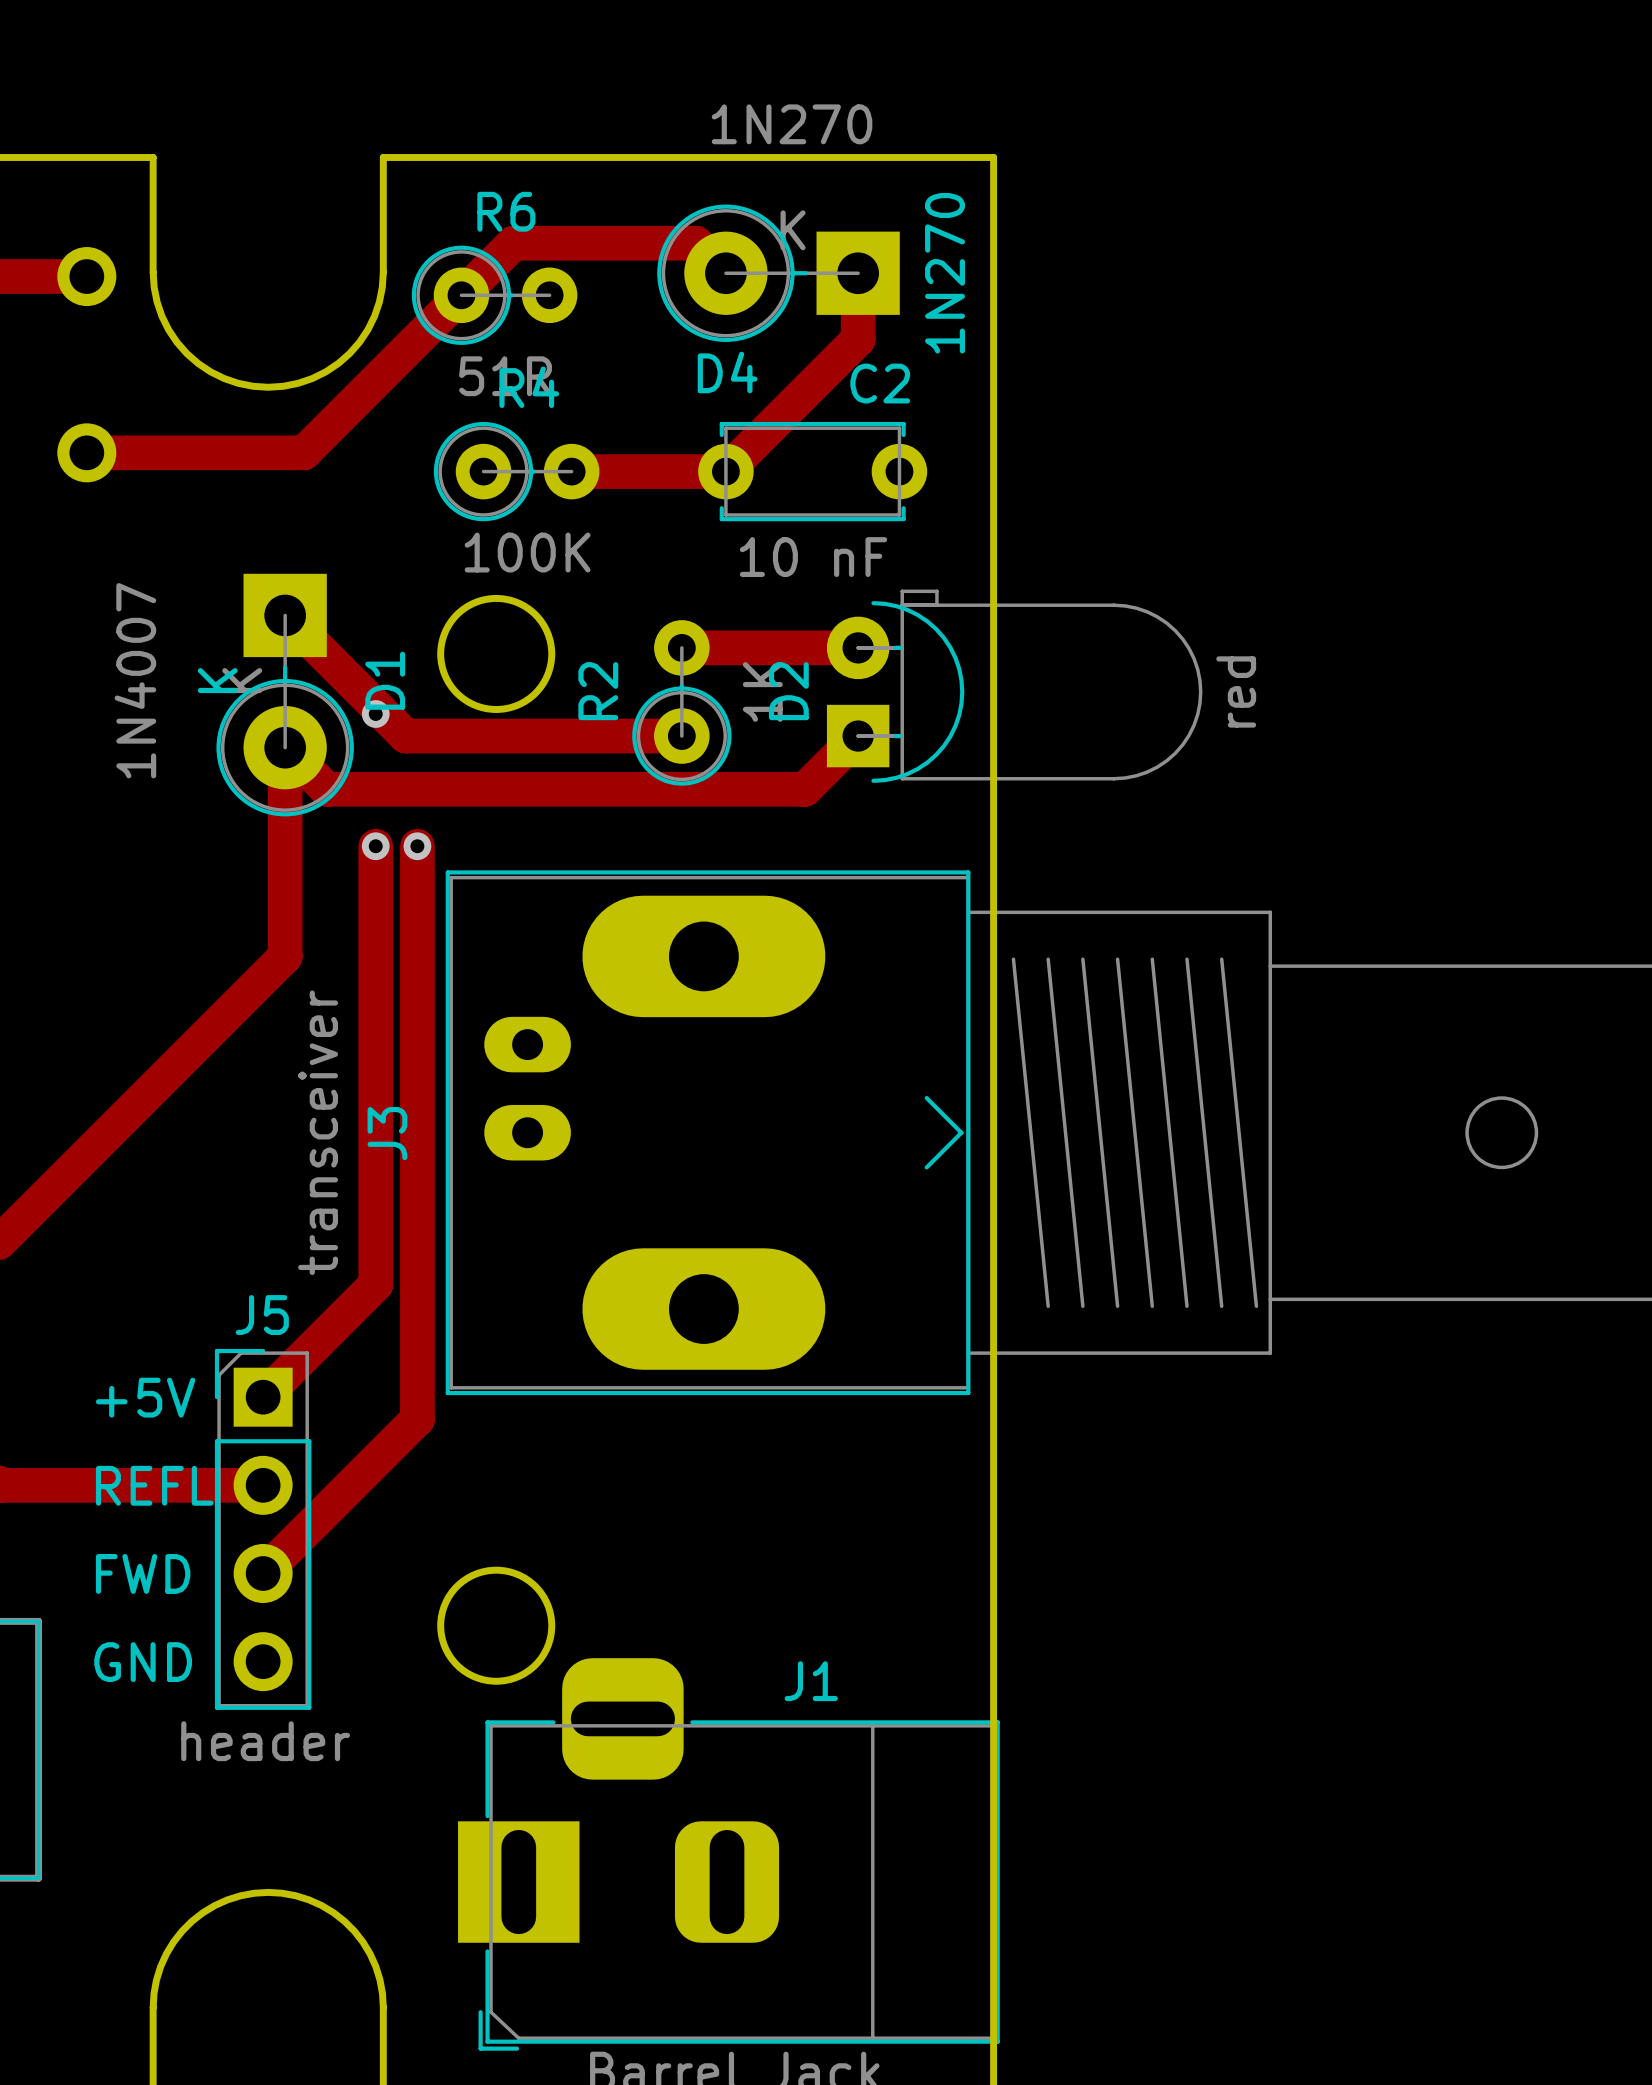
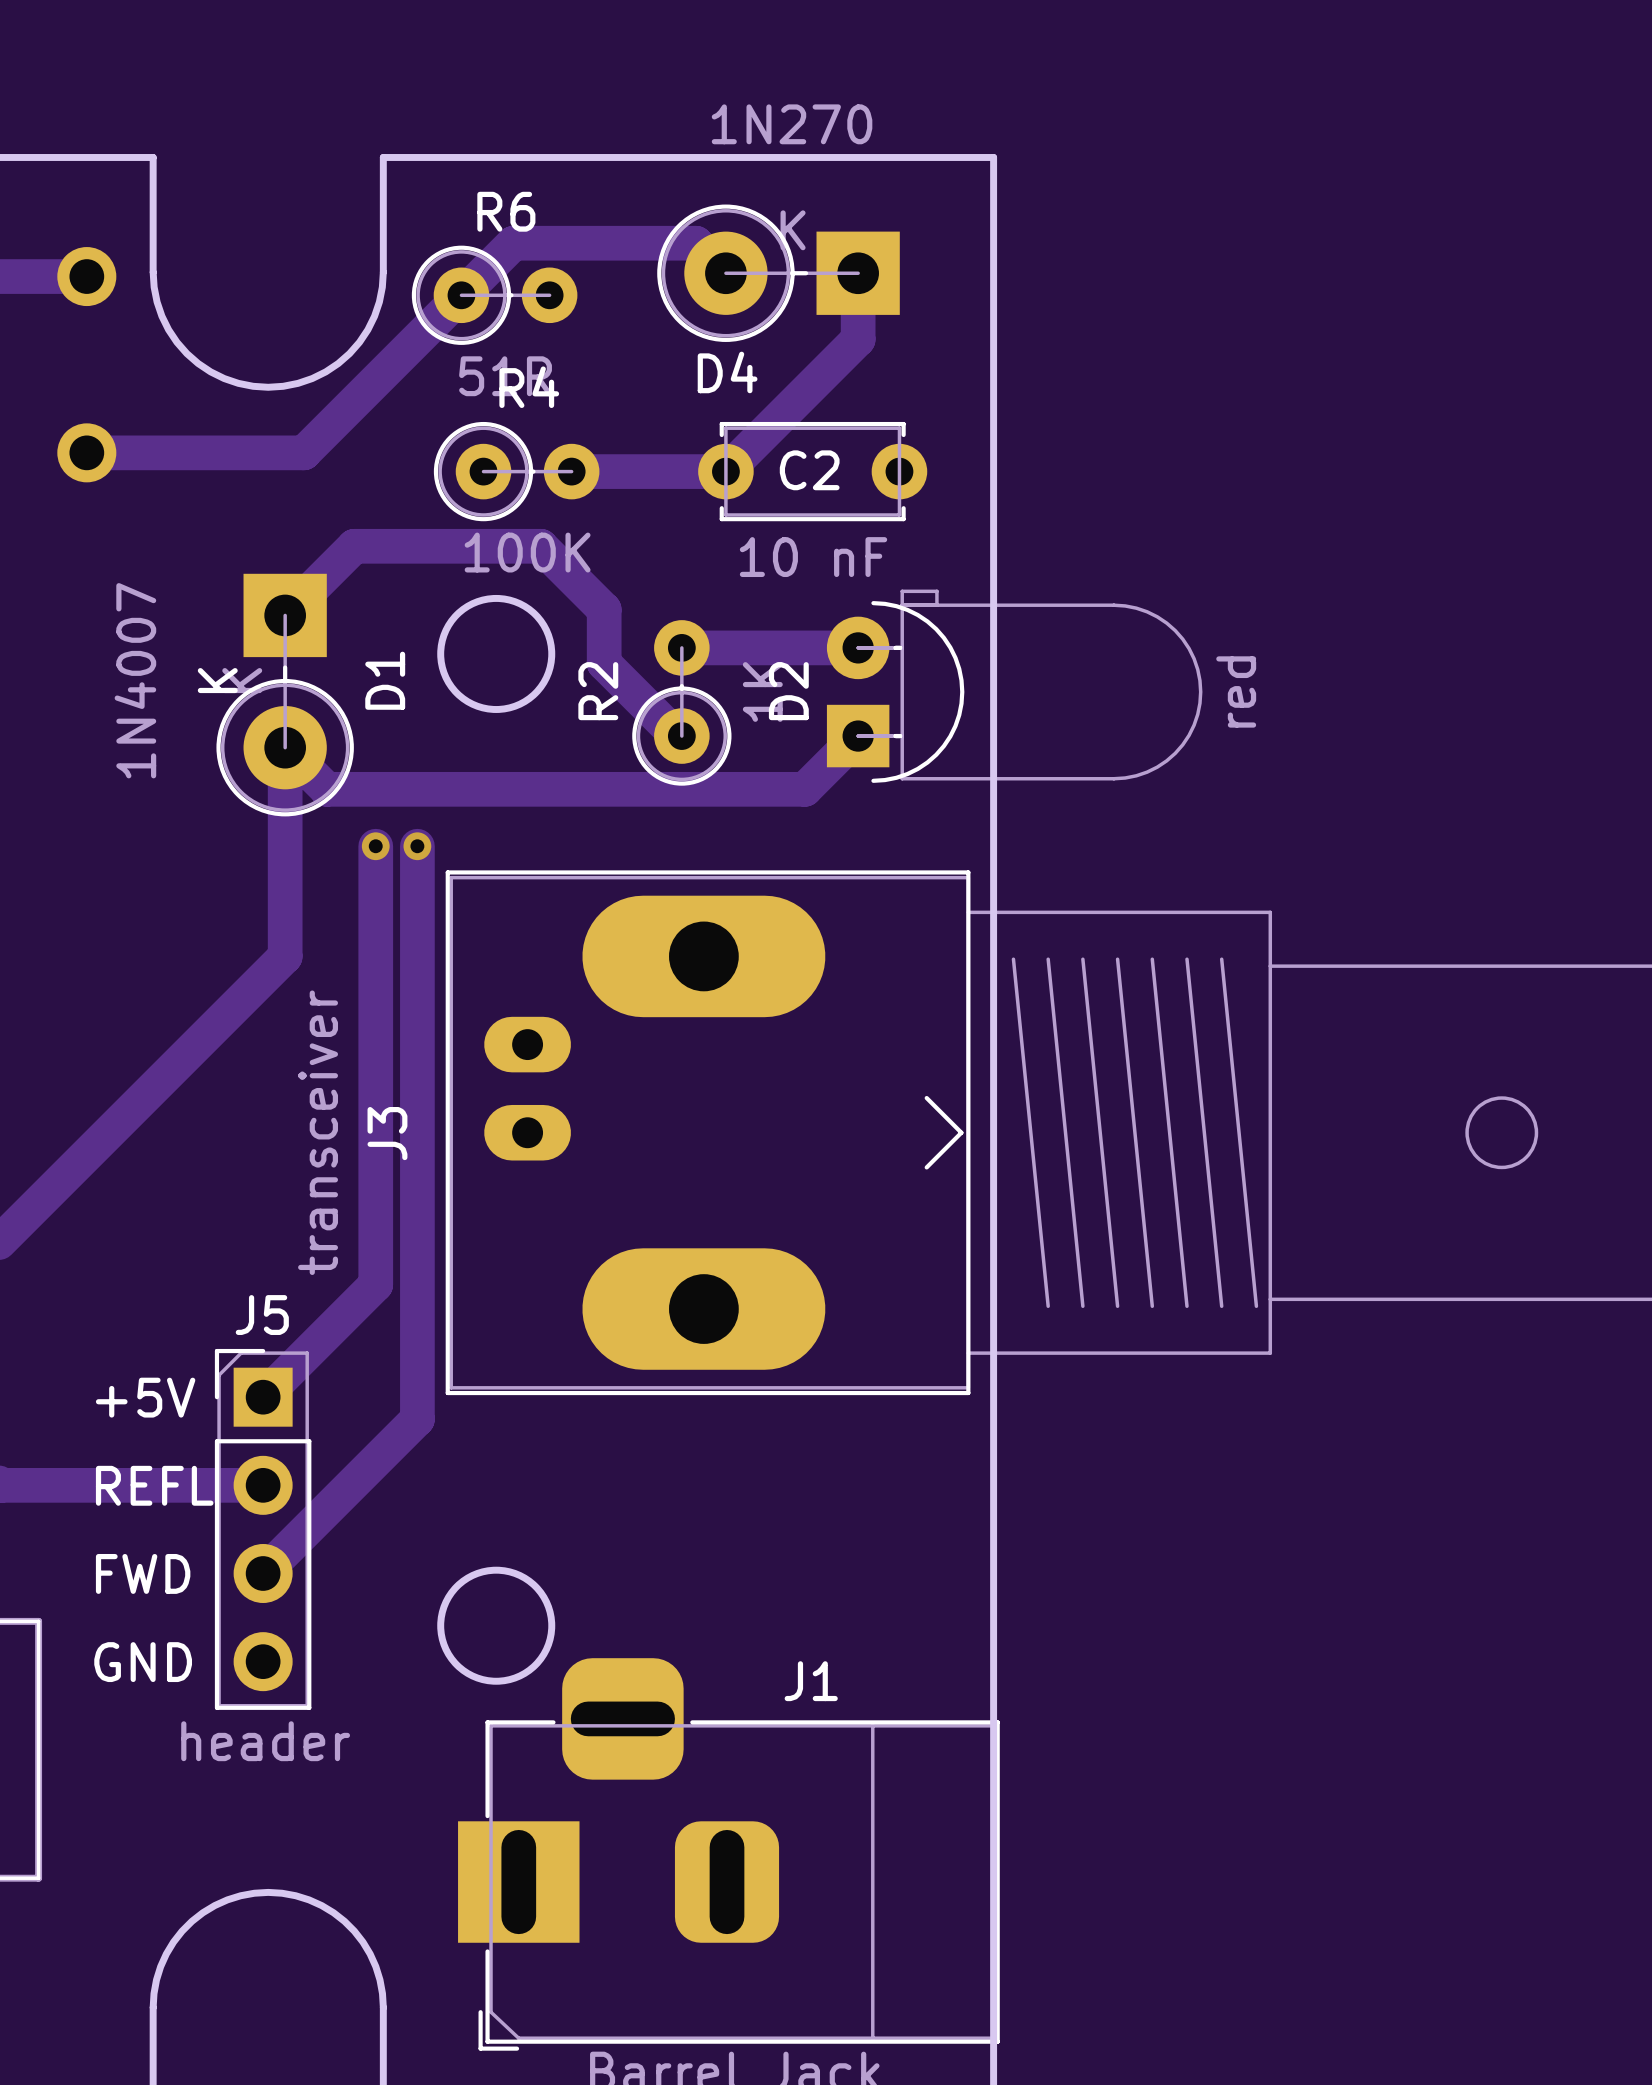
D4 text: 1N270 (945, 273) -> none
C2 name position: C2 (880, 383) -> C2 (809, 470)
track: (285, 615) (405, 736) (676, 736) -> (285, 615) (354, 546) (540, 546) (604, 609) (604, 663) (676, 736)
via: (375, 714) -> none

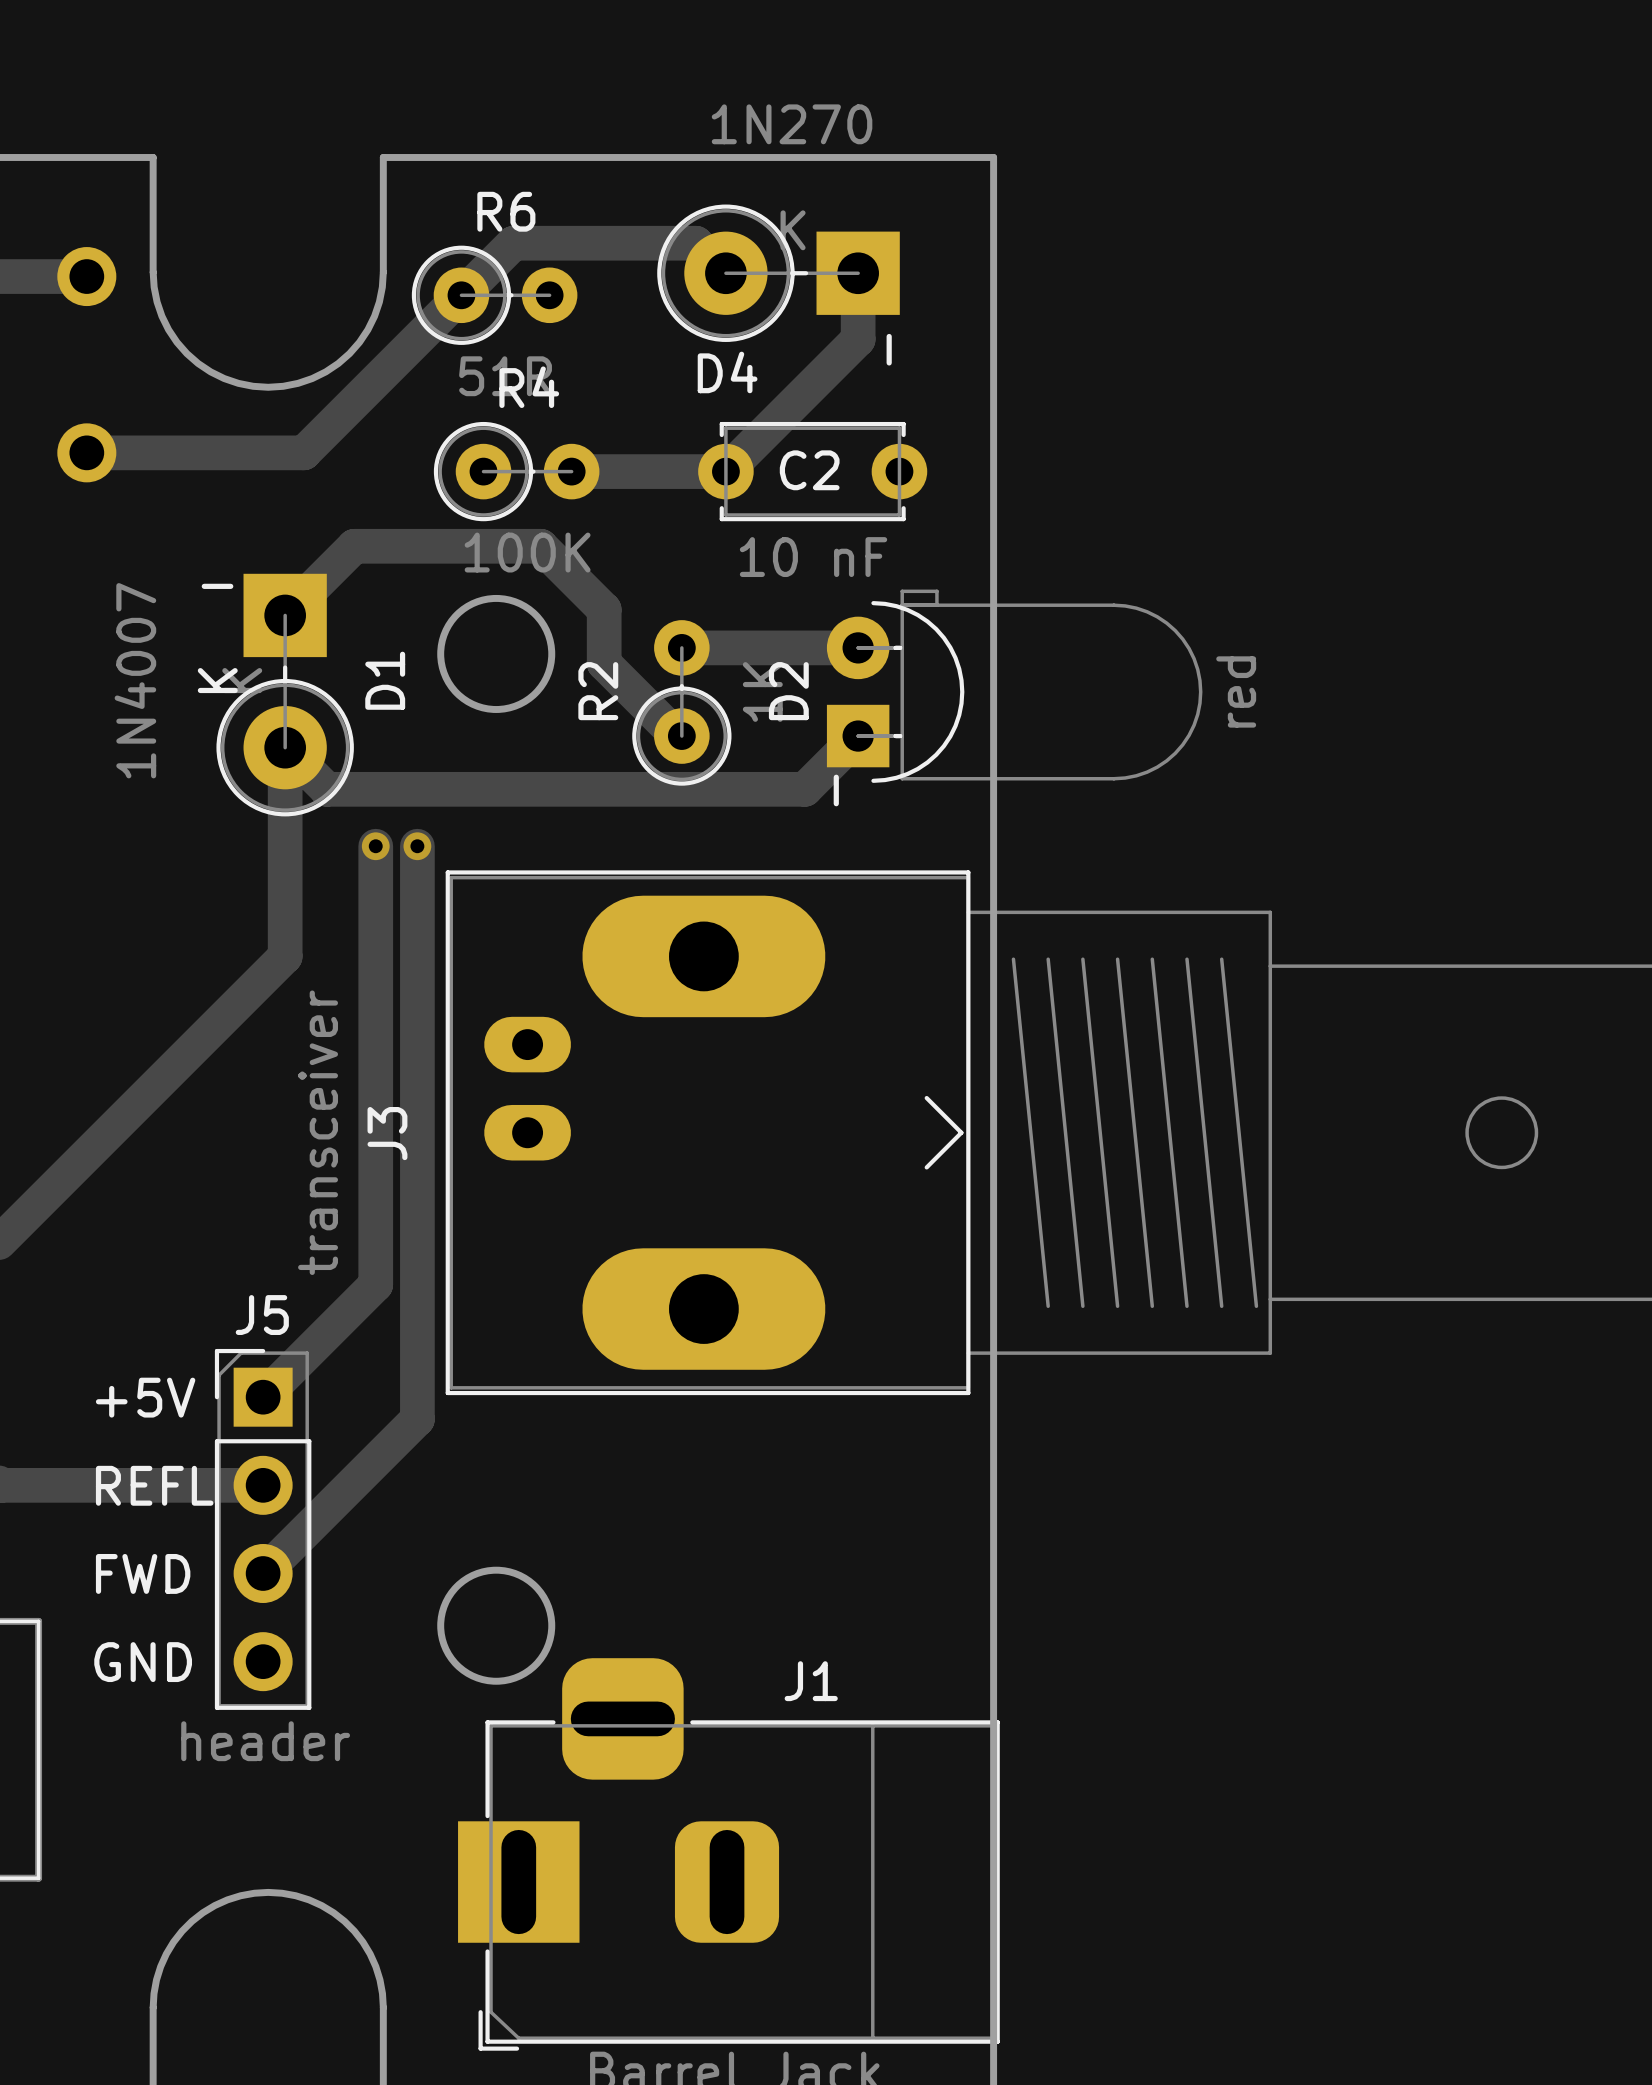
text: none -> - (889, 349)
text: none -> - (217, 586)
text: none -> - (836, 790)

